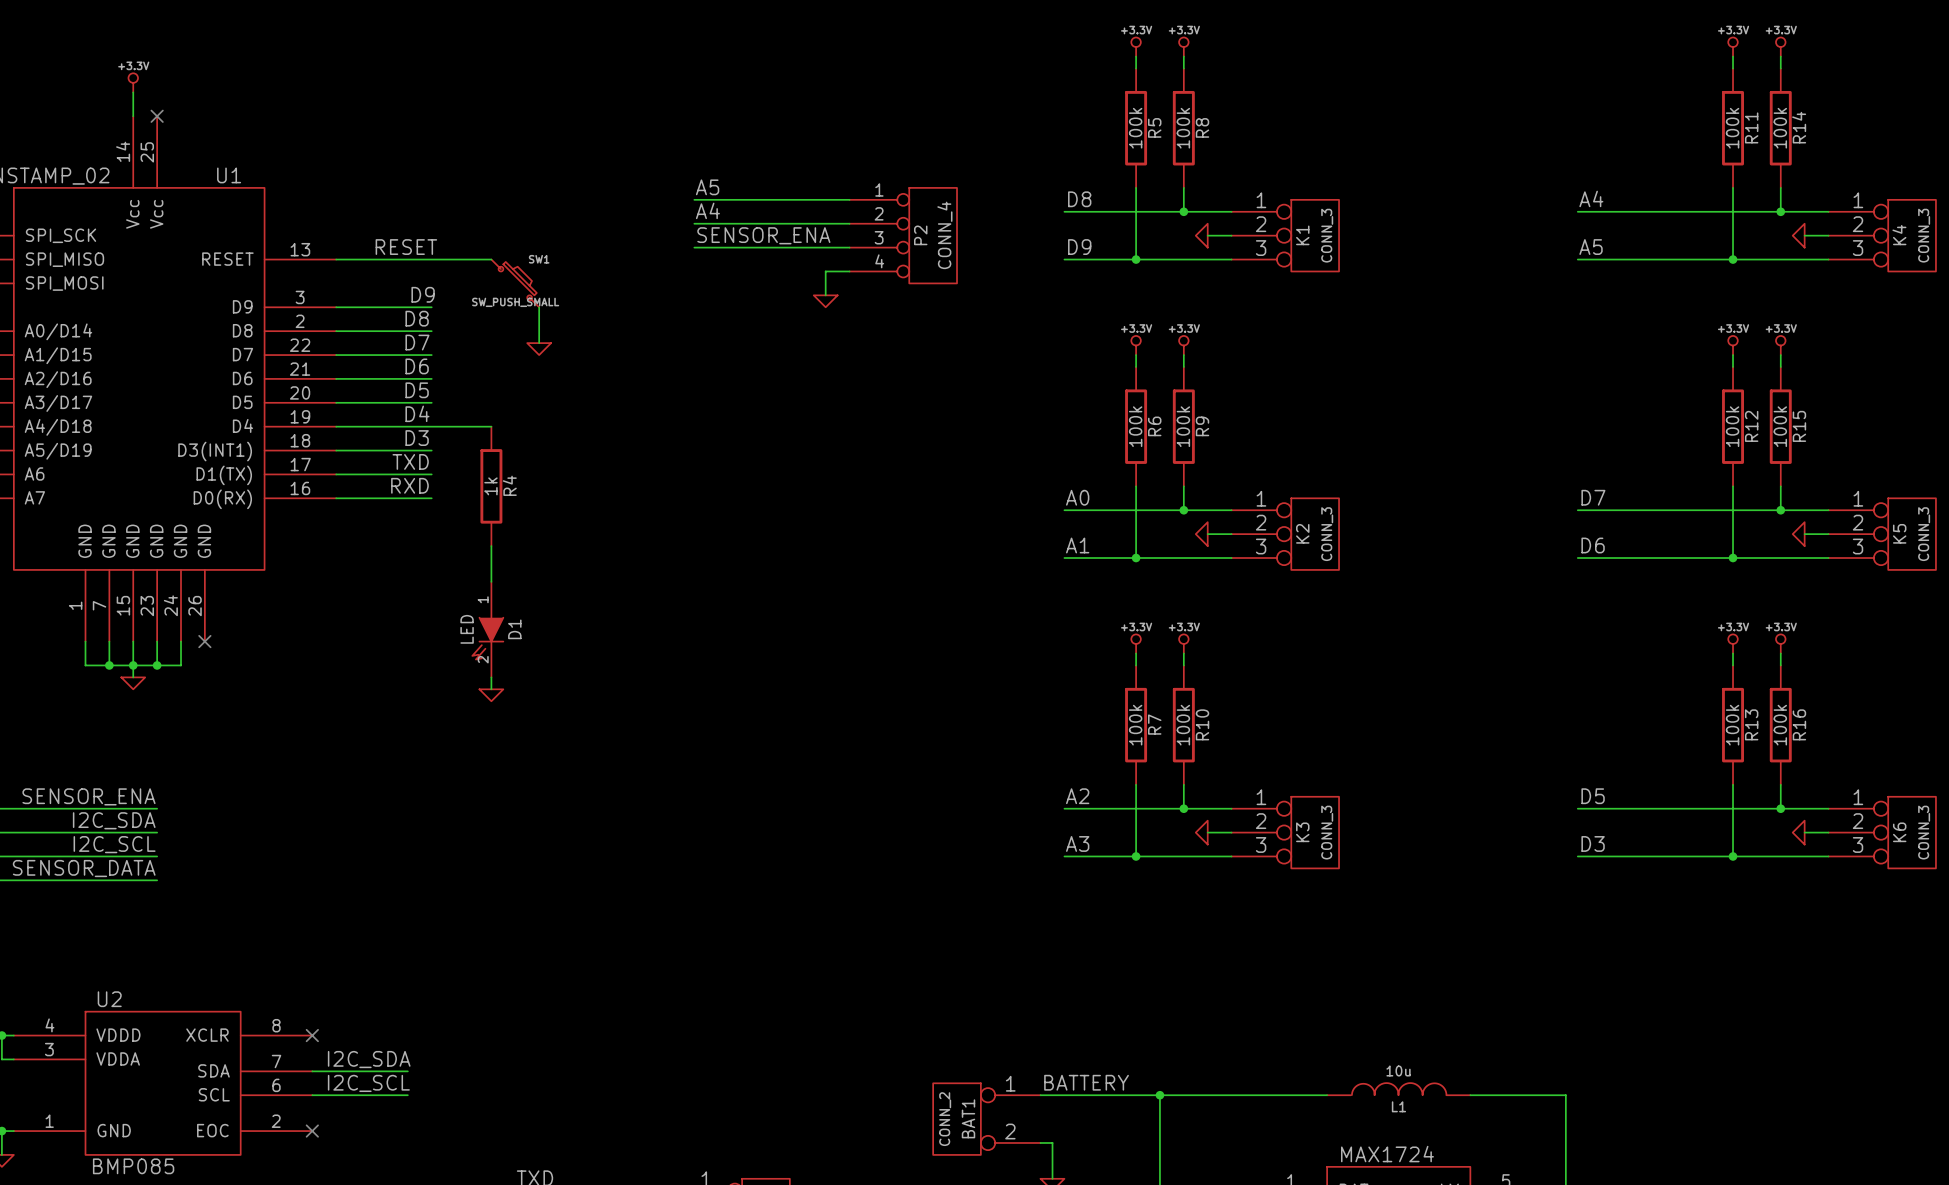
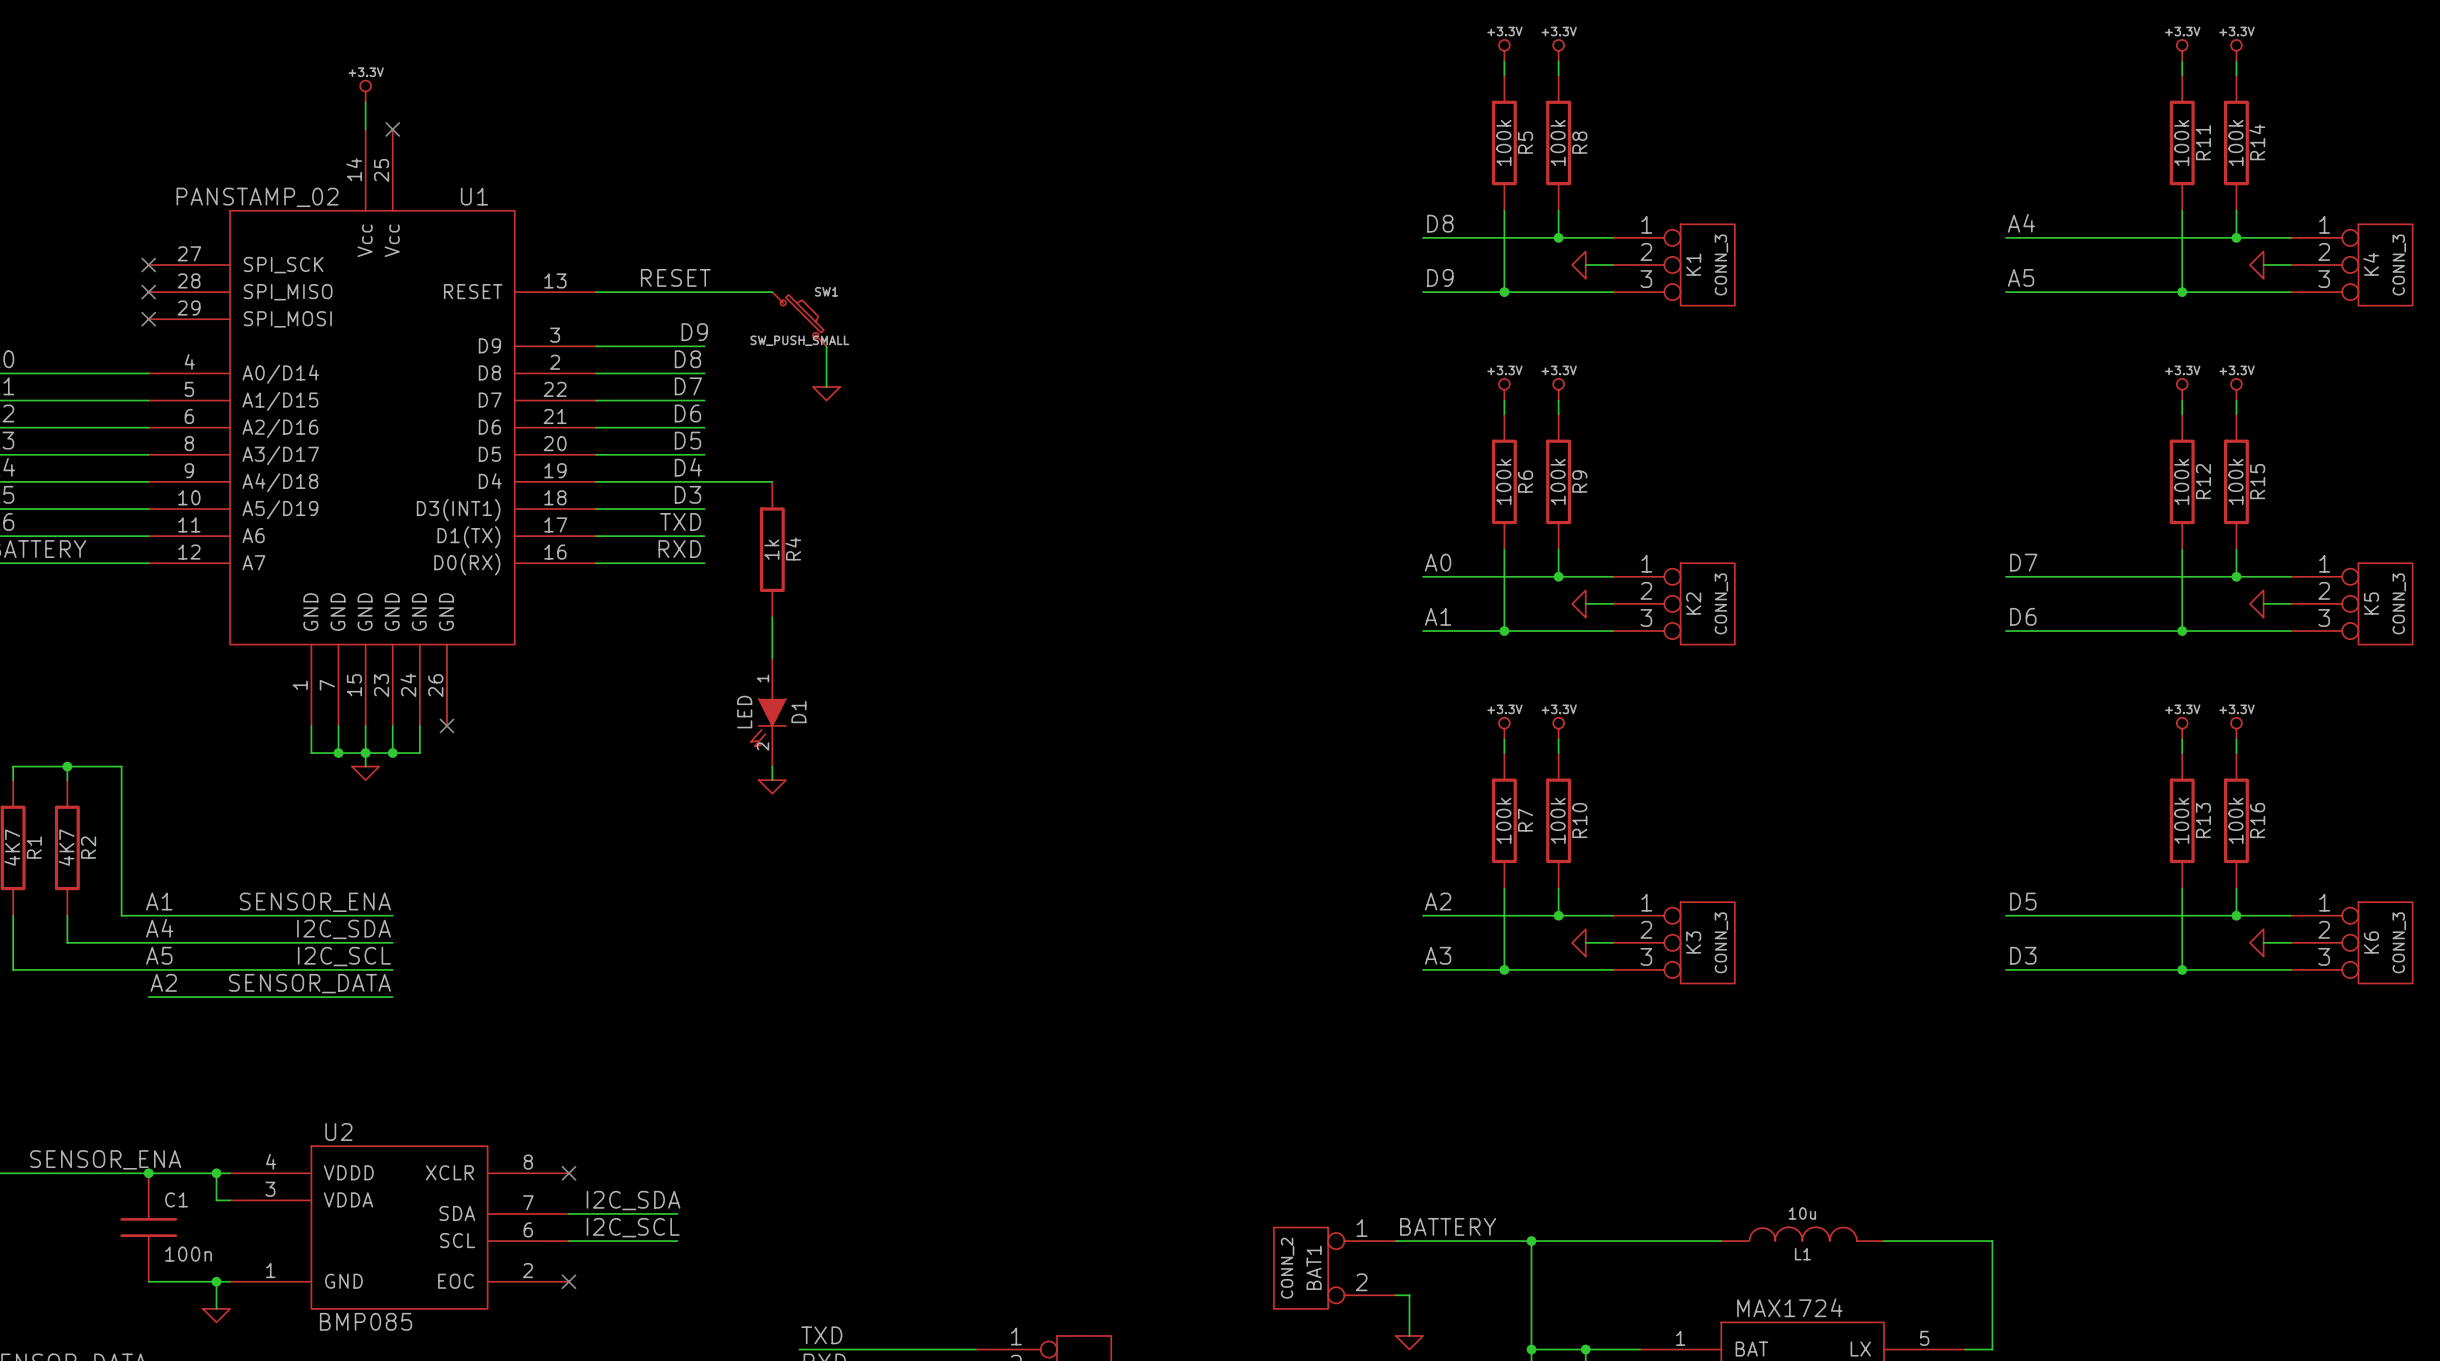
label: A5 (707, 187) -> none
wire: (694, 199) (849, 199) -> none
label: A4 (707, 210) -> none
wire: (694, 223) (849, 223) -> none
label: SENSOR_ENA (763, 235) -> none
P2: CONN_4 (903, 235) -> none
wire: (694, 247) (849, 247) -> none
wire: (849, 271) (825, 271) (825, 295) -> none
power symbol: (825, 301) -> none

